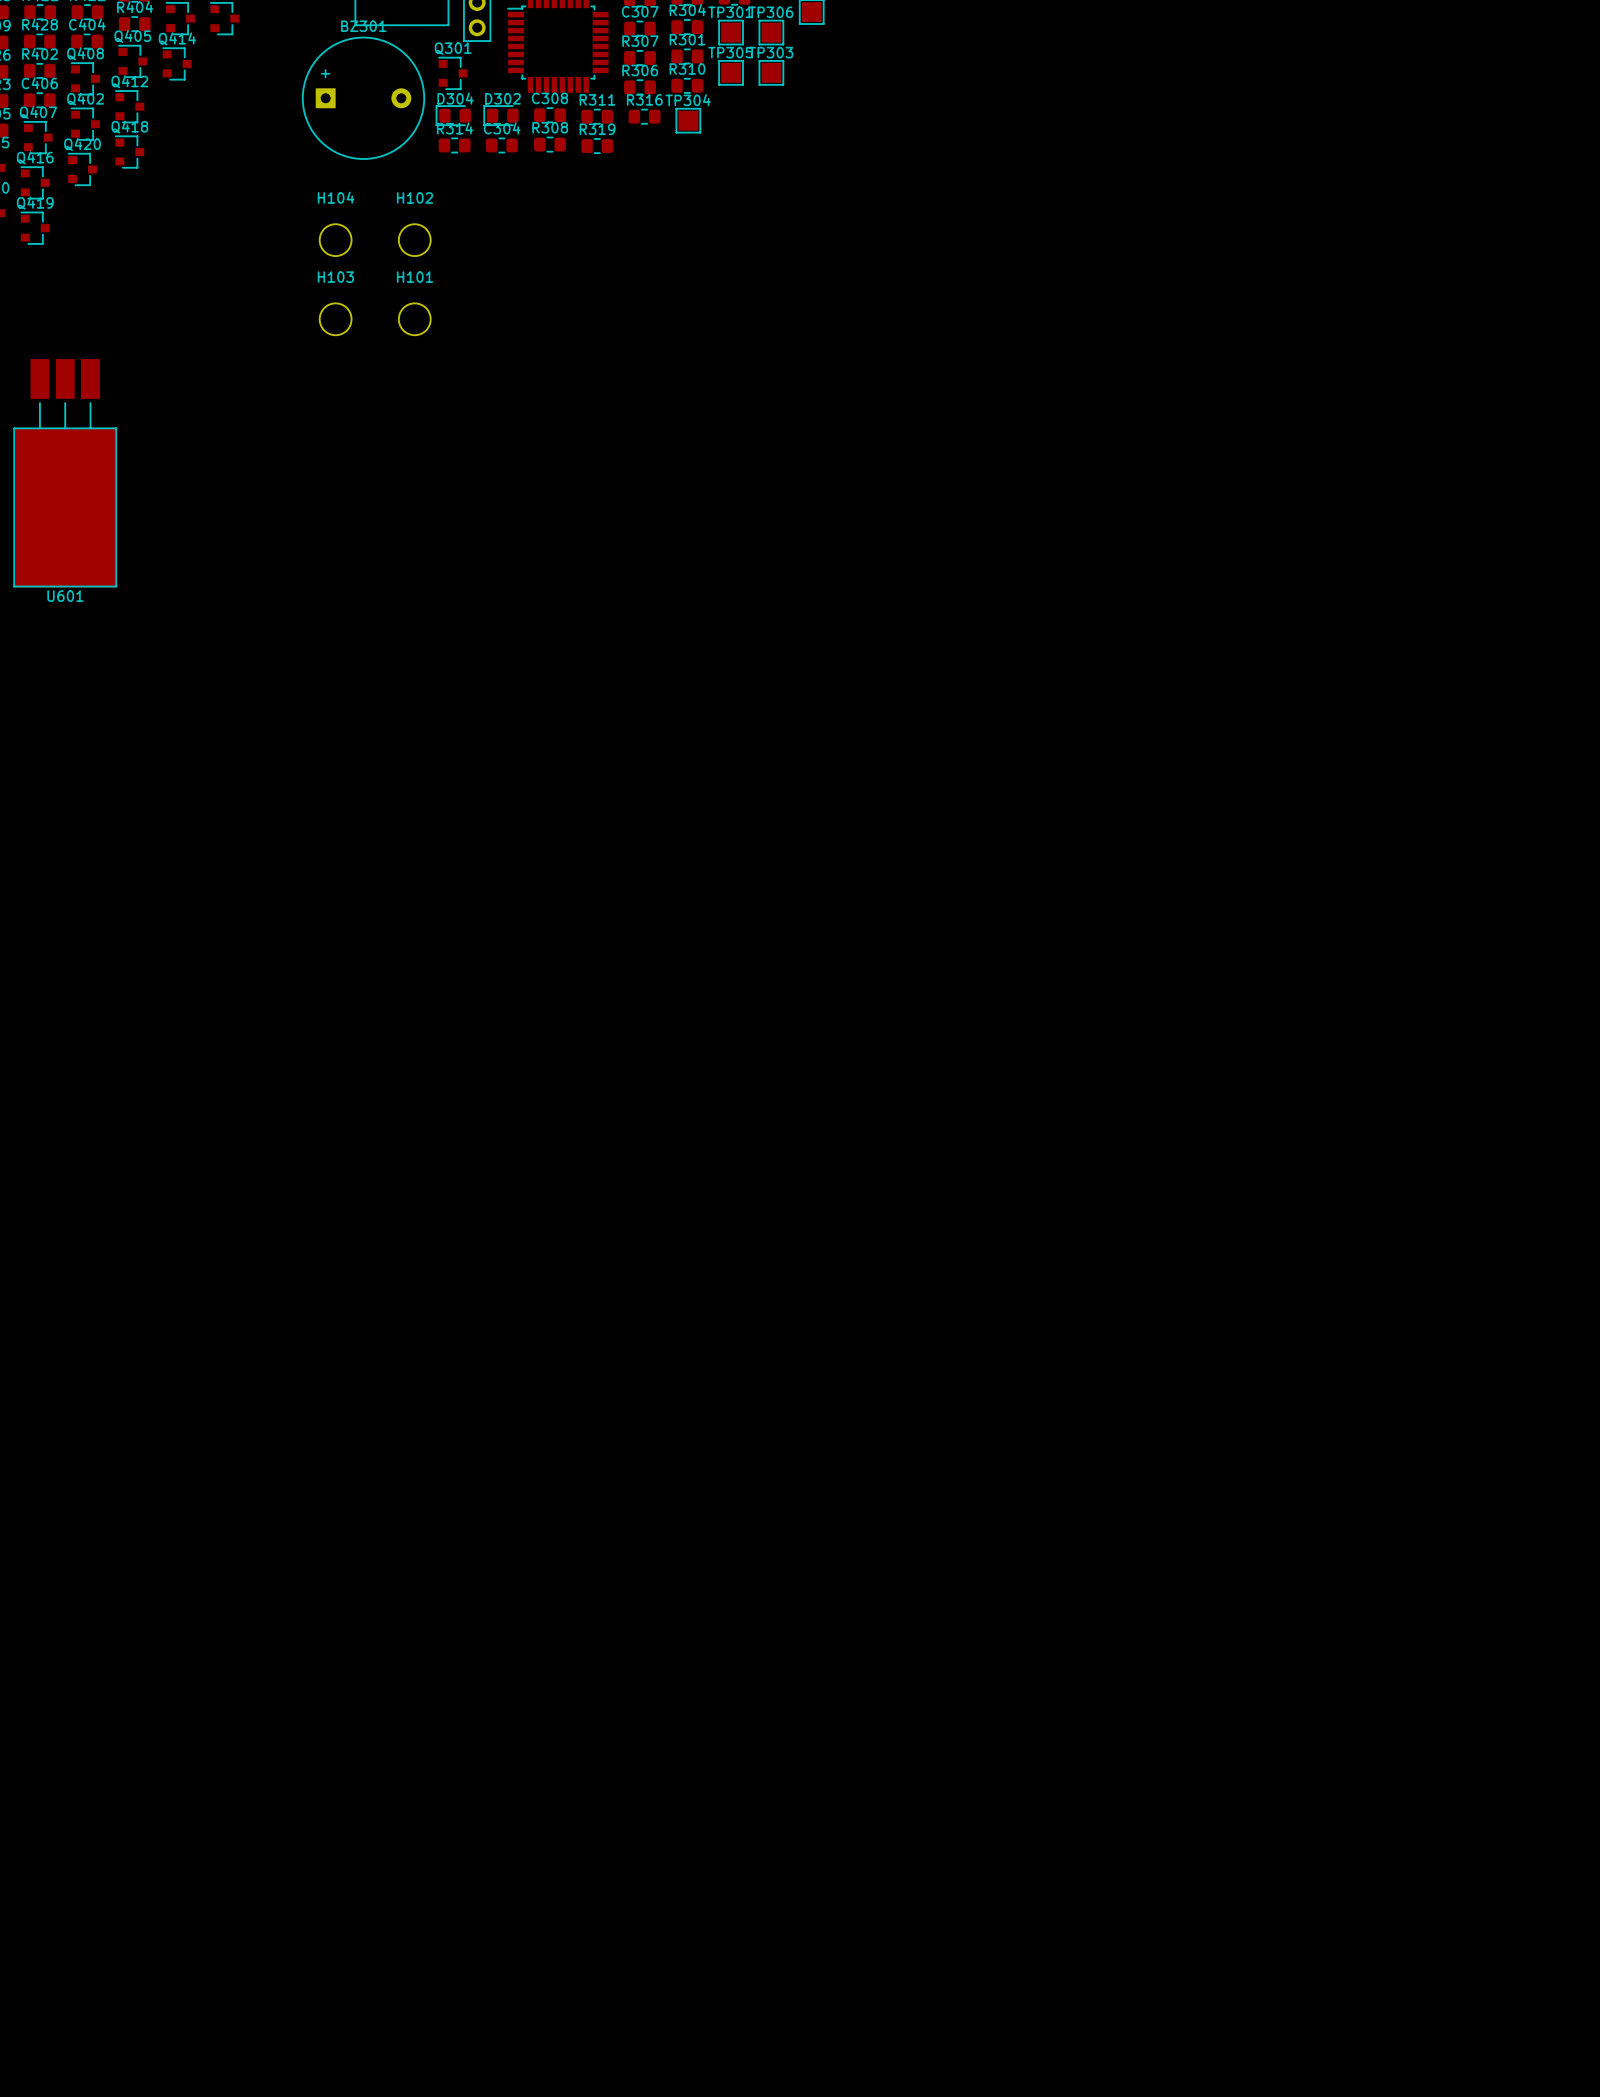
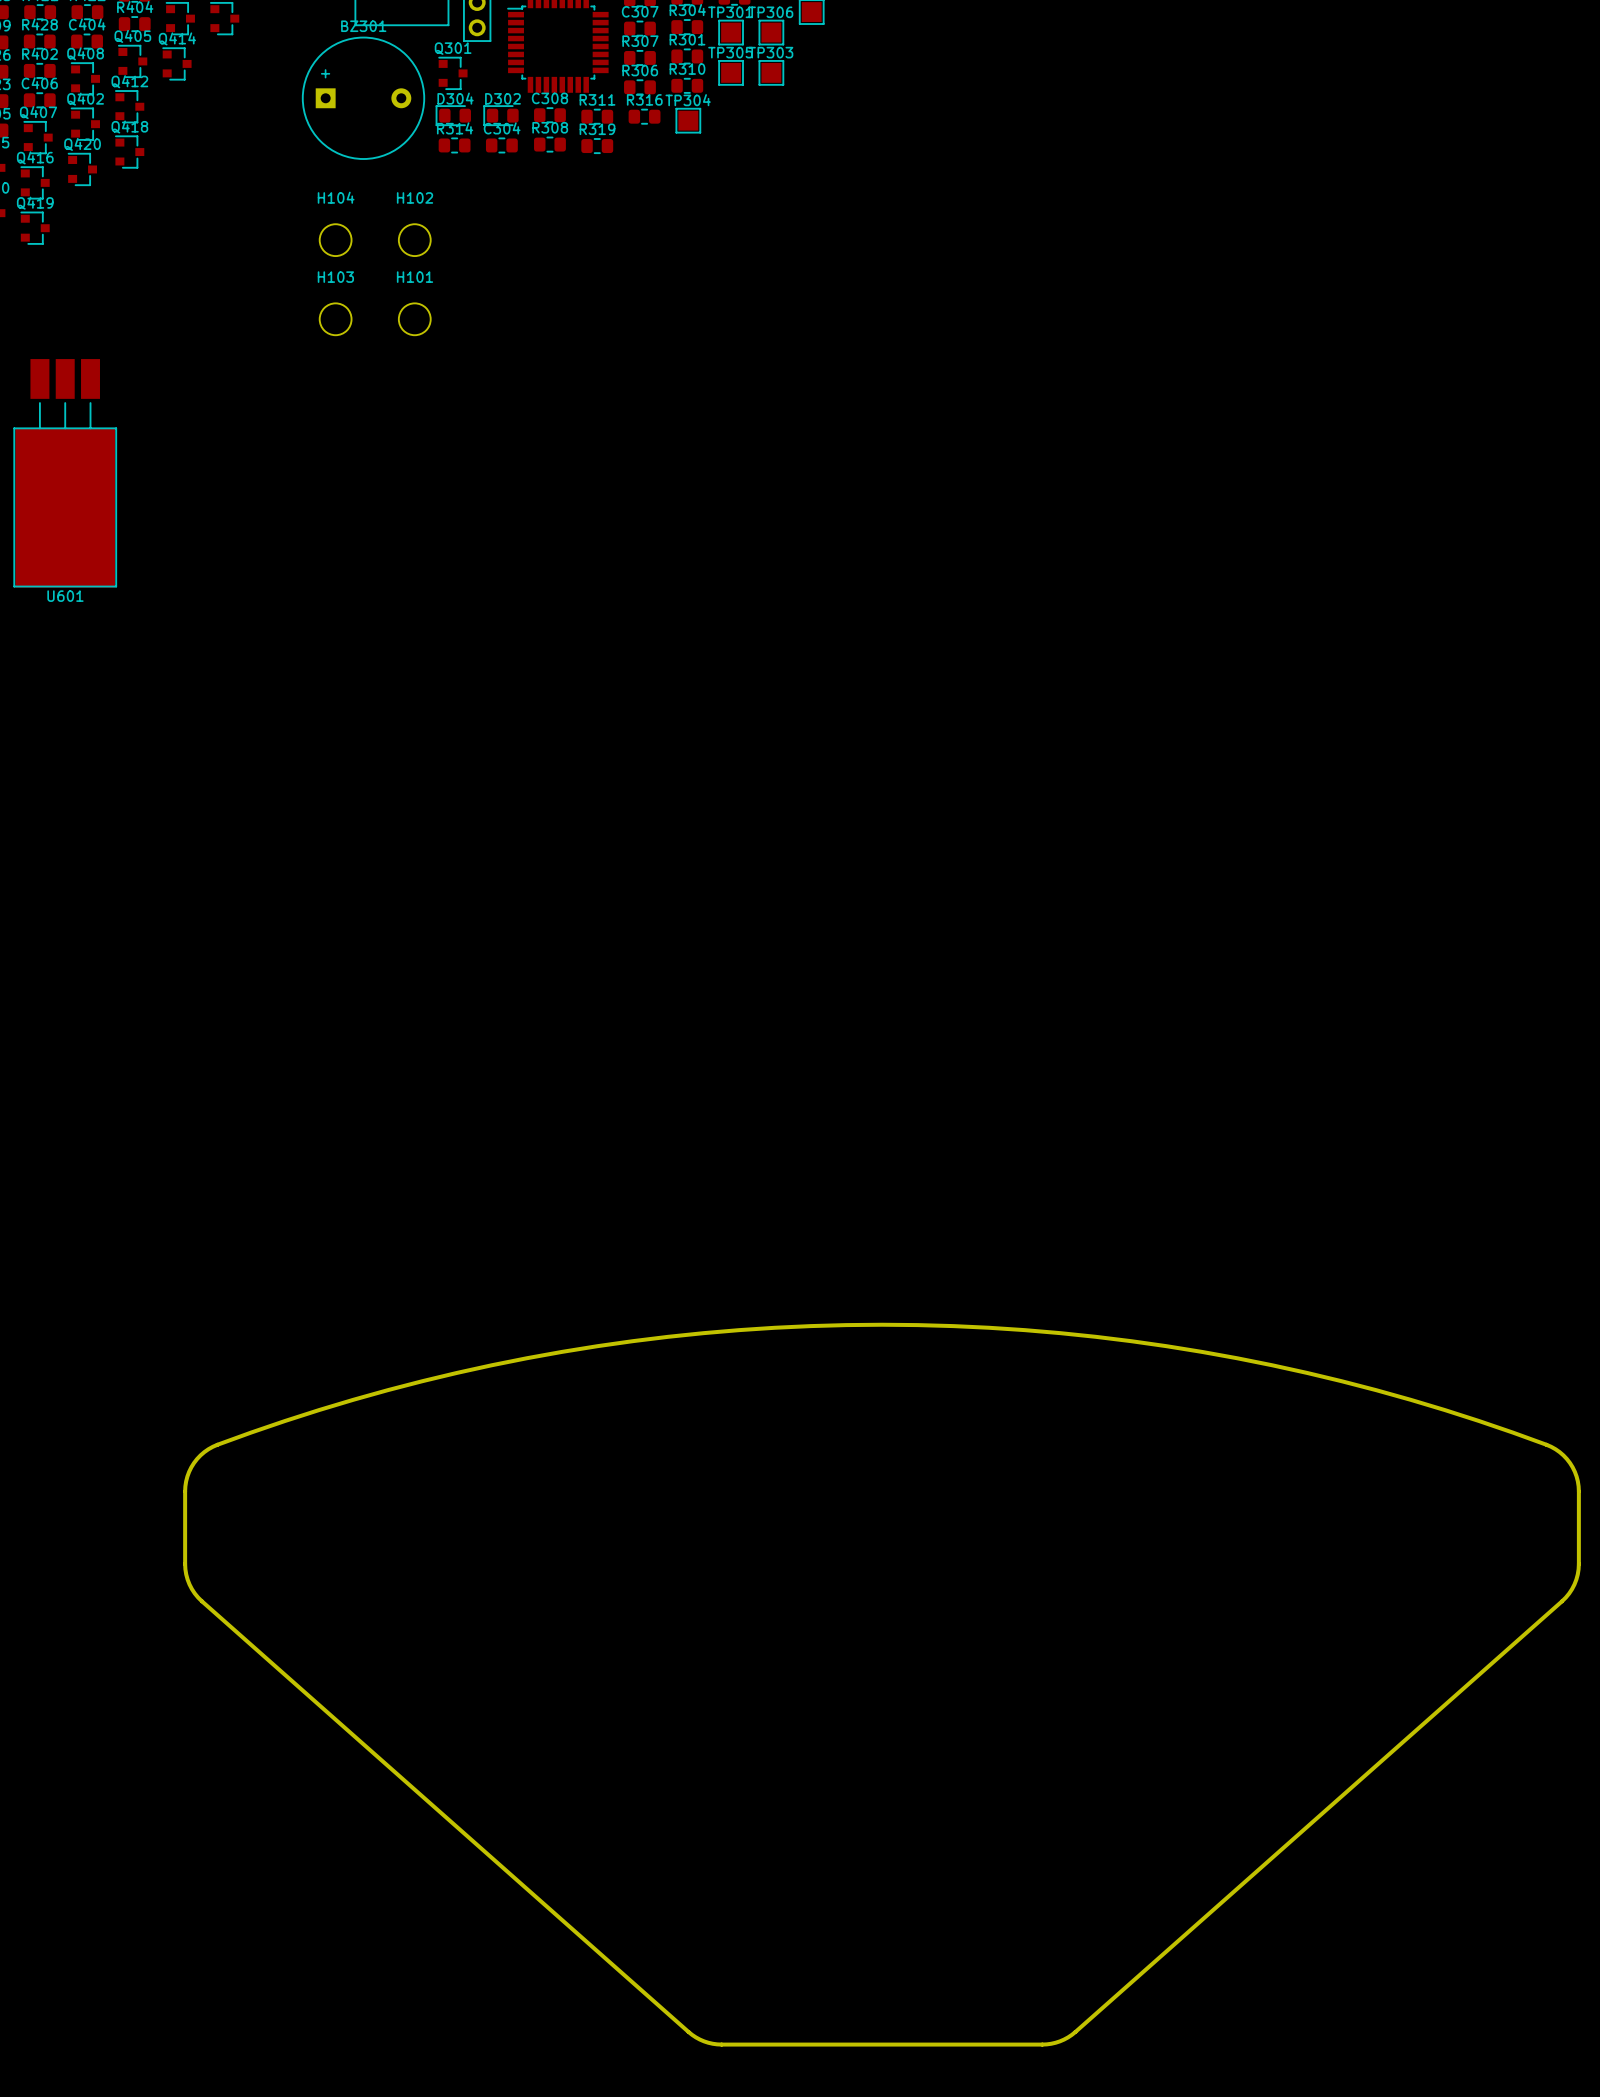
board edge: none -> (217, 1444) (204, 1452) (194, 1463) (189, 1471) (185, 1486) (185, 1569) (189, 1584) (198, 1597) (688, 2032) (704, 2041) (717, 2044) (1042, 2044) (1055, 2042) (1068, 2037) (1562, 1601) (1574, 1584) (1578, 1569) (1577, 1481) (1572, 1467) (1566, 1459) (1551, 1446) (1445, 1410) (1307, 1372) (1166, 1346) (1060, 1333) (953, 1326) (846, 1325) (739, 1330) (632, 1341) (526, 1358) (422, 1381) (318, 1410) (217, 1444)

